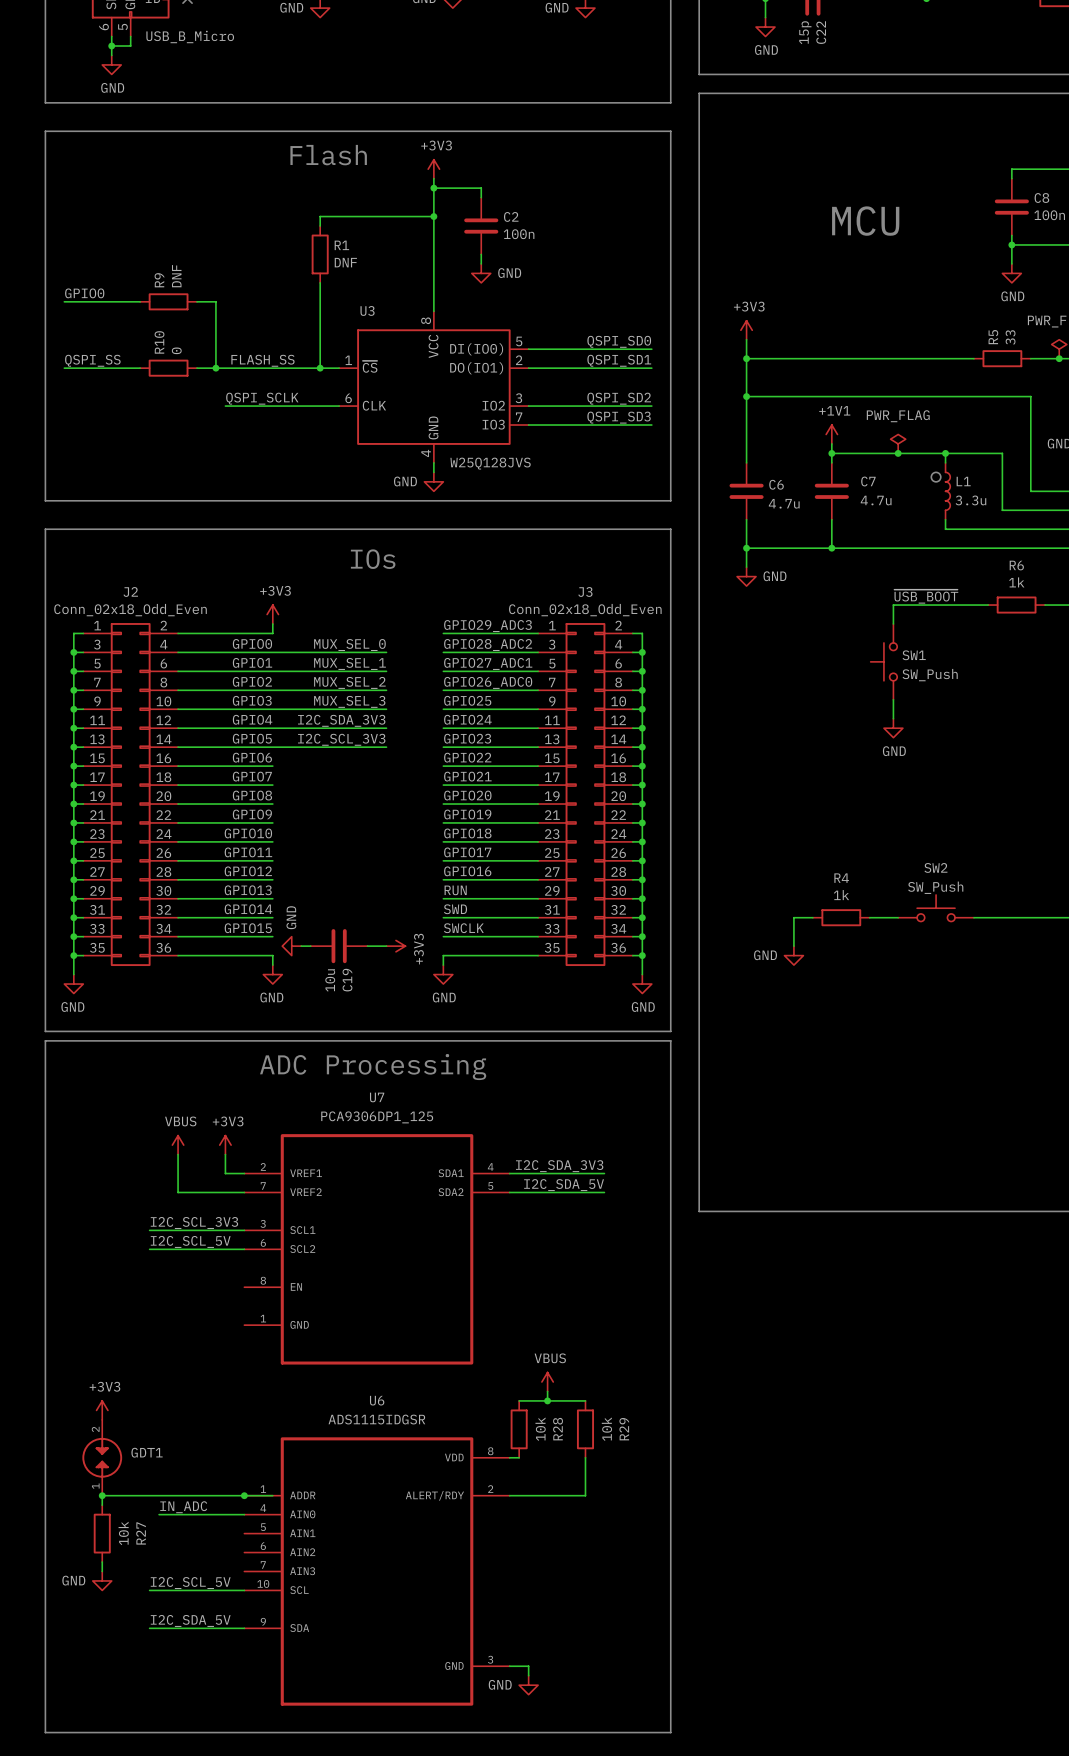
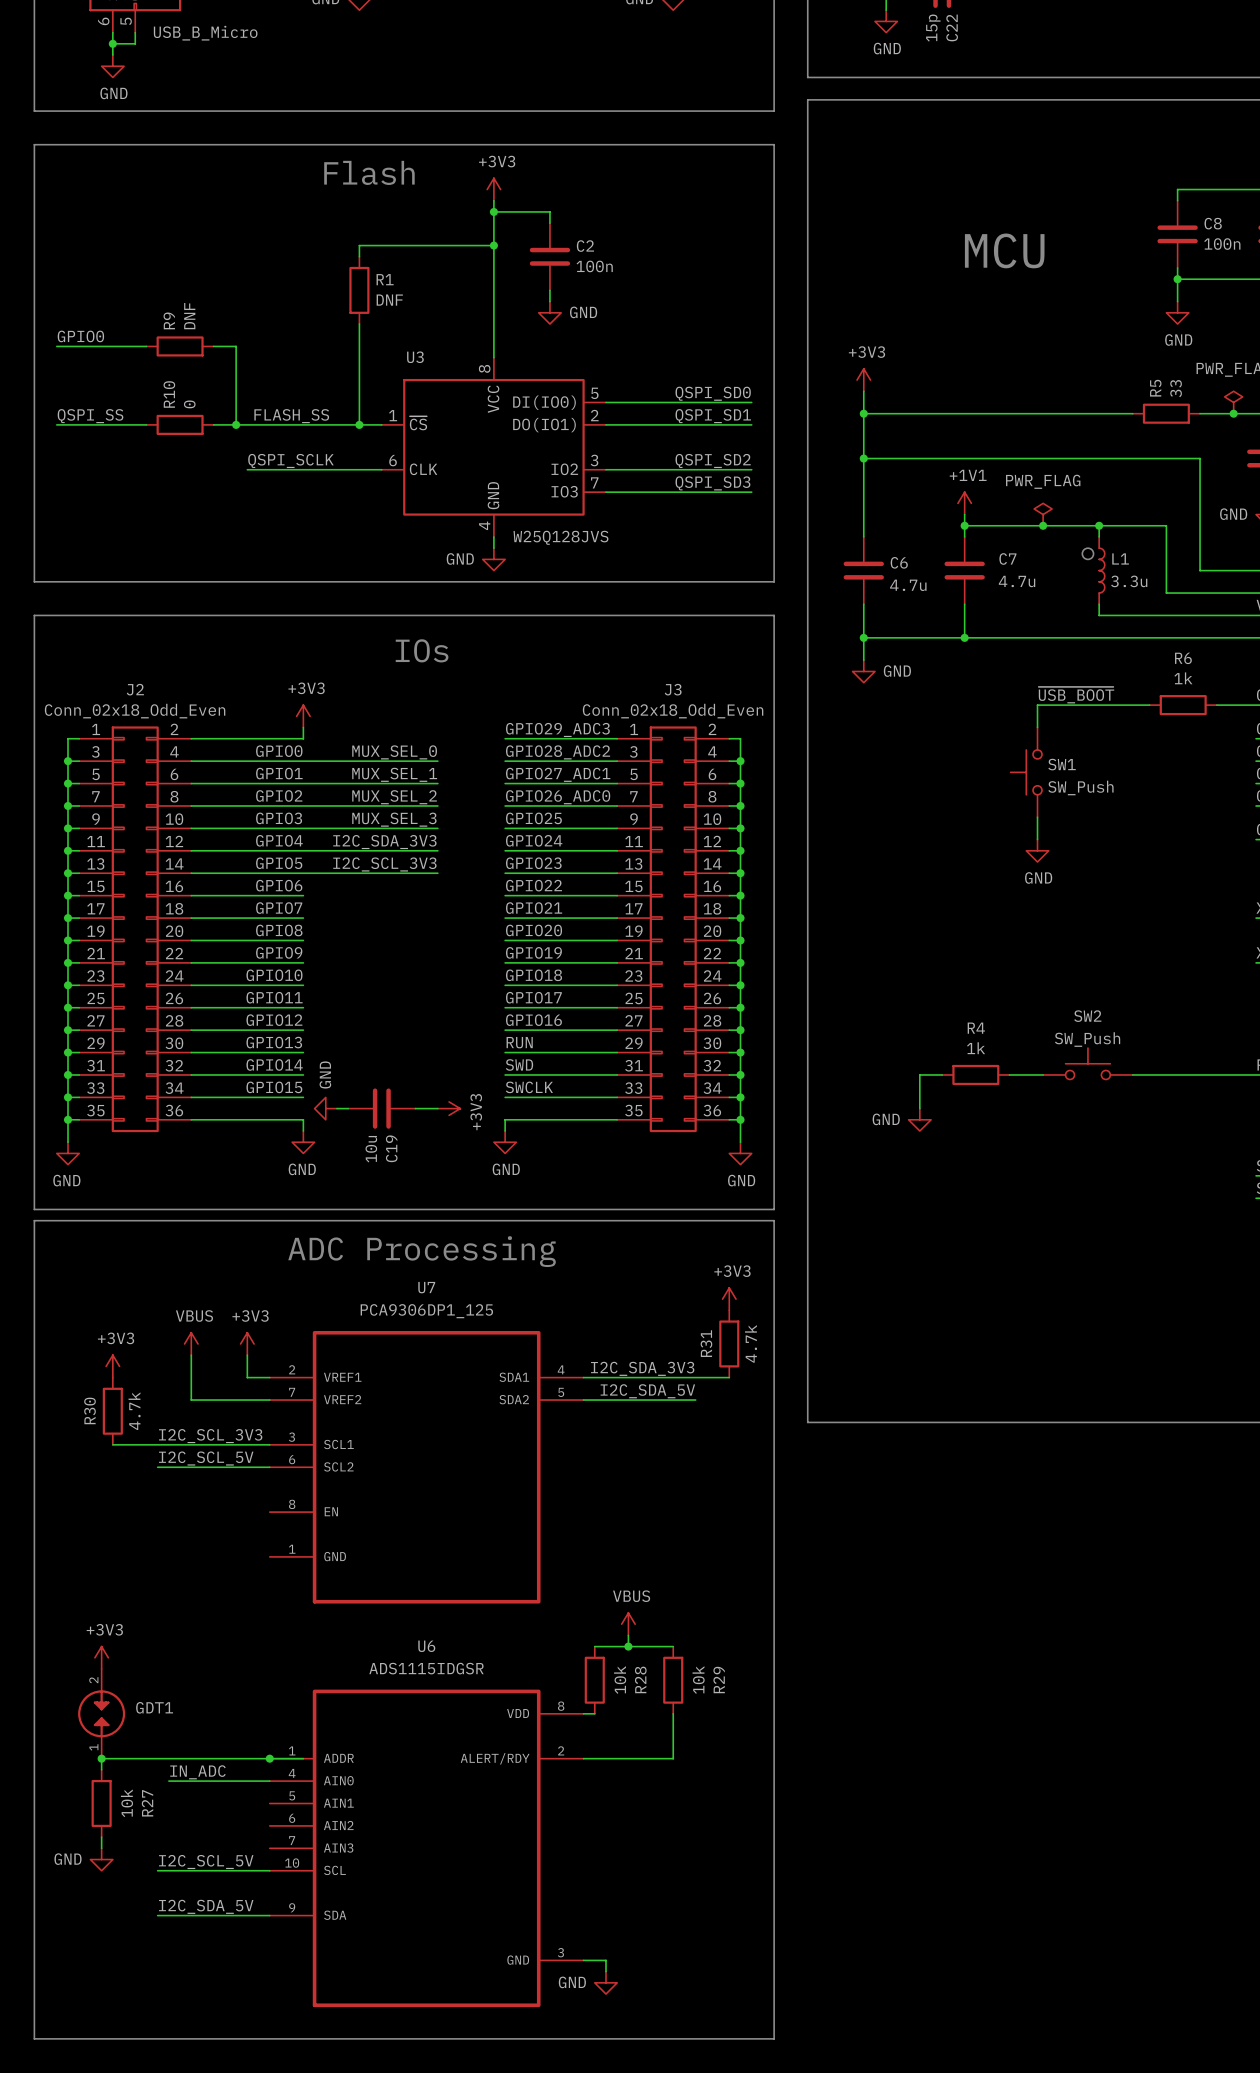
power symbol: none -> +3V3 (729, 1299)
R31: none -> 4.7k (729, 1343)
power symbol: none -> +3V3 (112, 1366)
wire: none -> (695, 1377) (729, 1377)
R30: none -> 4.7k (112, 1411)
wire: none -> (112, 1444) (157, 1444)

